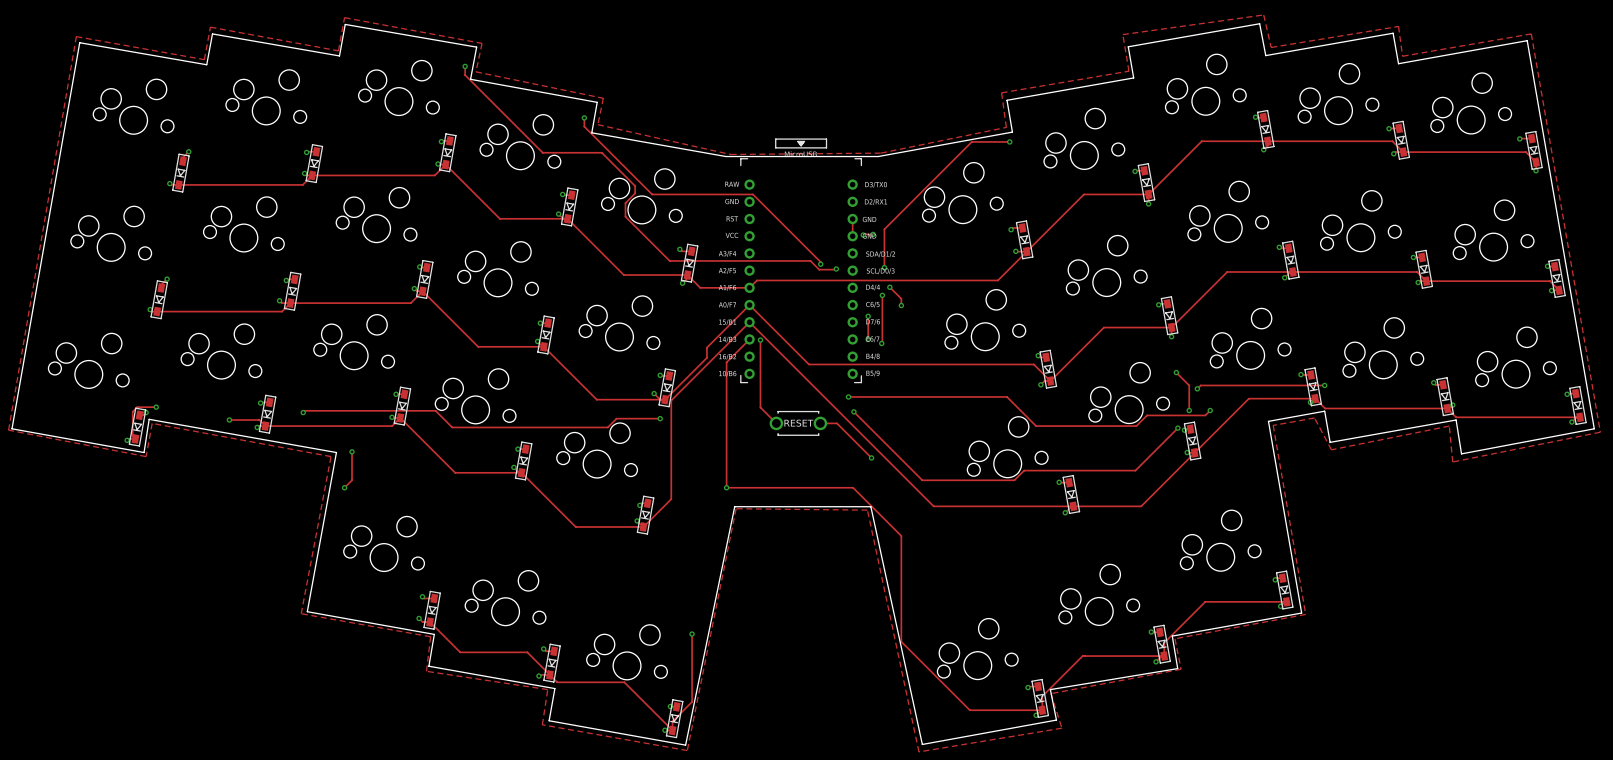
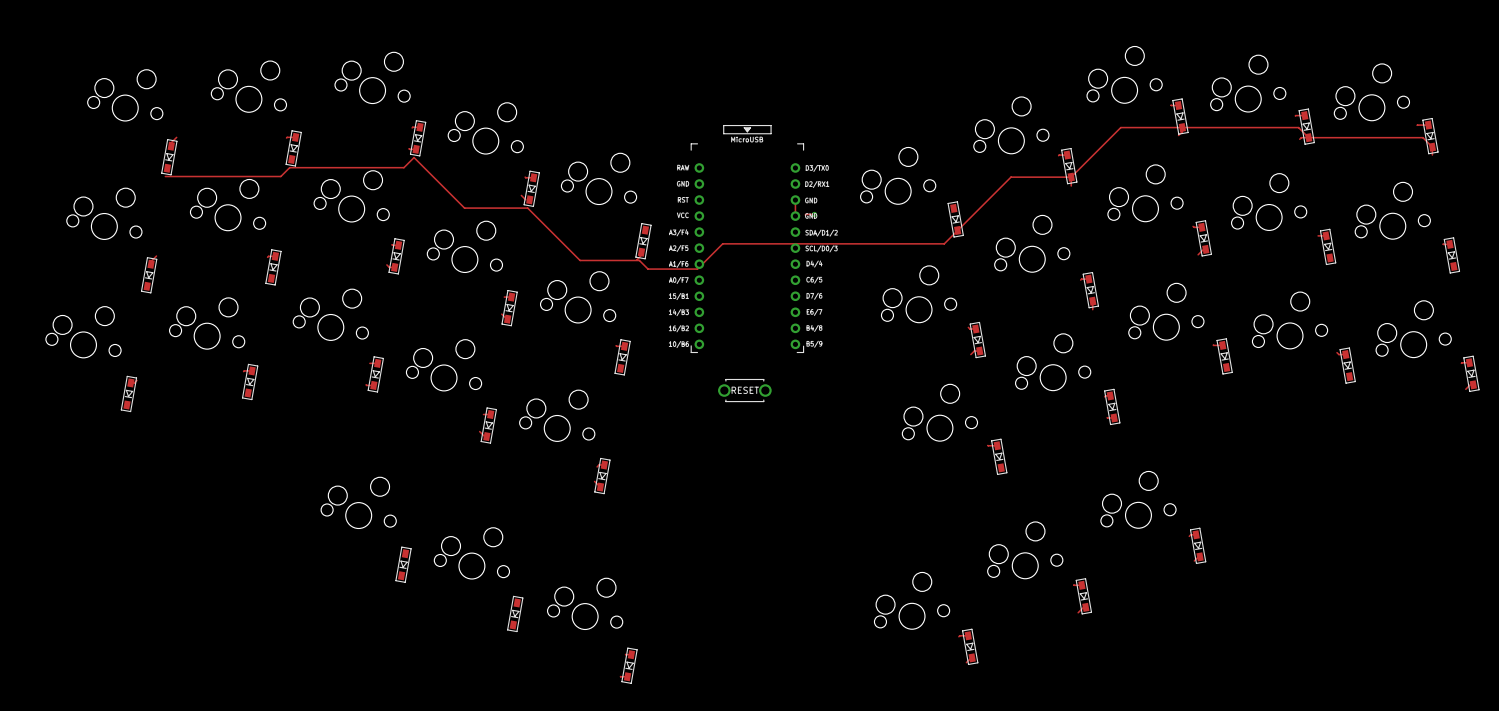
zone outline: (1263, 14) (1122, 34) (1128, 71) (1001, 92) (1006, 127) (881, 153) (730, 154) (597, 124) (603, 98) (475, 71) (482, 43) (344, 17) (338, 50) (210, 27) (204, 59) (76, 36) (8, 430) (146, 456) (152, 423) (331, 456) (301, 613) (430, 636) (426, 671) (547, 689) (542, 724) (687, 750) (736, 508) (867, 510) (918, 751) (1061, 728) (1051, 693) (1181, 669) (1175, 638) (1305, 614) (1273, 425) (1314, 417) (1331, 449) (1449, 426) (1452, 462) (1600, 432) (1531, 33) (1402, 56) (1398, 26) (1271, 47) (1263, 14) -> none
board edge: (1259, 23) (1128, 46) (1133, 77) (1007, 100) (1012, 132) (878, 156) (725, 156) (591, 132) (597, 102) (470, 79) (476, 47) (345, 24) (339, 55) (212, 33) (206, 64) (79, 42) (11, 428) (144, 452) (149, 419) (336, 452) (307, 611) (434, 634) (428, 666) (554, 688) (549, 720) (685, 745) (734, 506) (870, 506) (922, 744) (1056, 720) (1050, 689) (1177, 668) (1172, 636) (1301, 613) (1268, 421) (1324, 411) (1330, 442) (1456, 420) (1461, 453) (1594, 428) (1527, 40) (1398, 63) (1393, 33) (1265, 55) (1259, 23) -> none
track: (465, 66) (465, 75) (542, 152) (601, 152) (635, 186) (635, 193) (625, 203) (625, 216) (669, 260) (810, 260) (819, 269) (836, 268) -> none
via: (465, 66) -> none
track: (584, 117) (584, 126) (652, 194) (753, 194) (820, 264) -> none
via: (584, 117) -> none
via: (1255, 117) -> none
via: (1389, 128) -> none
via: (1519, 138) -> none
via: (441, 141) -> none
track: (1009, 141) (971, 141) (884, 229) (884, 267) -> none
via: (1009, 141) -> none
via: (1263, 149) -> none
via: (188, 151) -> none
via: (306, 152) -> none
via: (1393, 153) -> none
via: (438, 163) -> none
via: (1536, 170) -> none
via: (1135, 171) -> none
track: (304, 173) (306, 175) (434, 175) (445, 164) (499, 218) (567, 218) (623, 275) (687, 275) (700, 287) (749, 287) (756, 280) (997, 280) (1012, 266) -> (165, 176) (280, 176) (289, 167) (403, 167) (414, 157) (464, 208) (527, 208) (580, 260) (639, 260) (648, 269) (697, 269) (722, 243) (944, 243)
via: (304, 173) -> none
track: (312, 175) (302, 184) (169, 183) -> none
via: (169, 183) -> none
via: (562, 194) -> none
via: (1148, 203) -> none
via: (558, 214) -> none
track: (1022, 228) (1011, 229) -> none
via: (1011, 229) -> none
via: (863, 235) -> none
via: (1279, 247) -> none
track: (679, 249) (681, 251) (691, 251) -> none
via: (679, 249) -> none
track: (1015, 251) (1026, 251) -> none
via: (1015, 251) -> none
via: (1413, 257) -> none
via: (820, 264) -> none
via: (419, 266) -> none
via: (1547, 266) -> none
via: (884, 267) -> none
via: (836, 268) -> none
via: (1284, 277) -> none
via: (167, 279) -> none
via: (286, 280) -> none
track: (1426, 281) (1417, 272) (1227, 272) (1171, 327) (1103, 327) (1050, 381) (1033, 364) (808, 364) (749, 305) (706, 347) (706, 357) (665, 399) (596, 399) (543, 346) (478, 346) (422, 291) (410, 303) (281, 303) (279, 300) -> none
track: (1418, 282) (1549, 281) (1559, 290) (1551, 290) -> none
via: (1418, 282) -> none
via: (682, 283) -> none
track: (889, 287) (901, 298) (901, 305) -> none
via: (889, 287) -> none
via: (414, 288) -> none
via: (1551, 290) -> none
track: (882, 295) (881, 343) -> none
via: (882, 295) -> none
via: (279, 300) -> none
track: (290, 303) (282, 311) (152, 311) (150, 309) -> none
via: (1158, 304) -> none
via: (901, 305) -> none
via: (150, 309) -> none
track: (868, 316) (868, 339) -> none
via: (868, 316) -> none
via: (540, 323) -> none
via: (1171, 336) -> none
track: (749, 339) (726, 362) (726, 487) (853, 487) (901, 536) (901, 641) (969, 710) (1042, 710) (1042, 696) (1082, 655) (1164, 656) (1164, 642) (1205, 601) (1286, 601) -> none
via: (868, 339) -> none
track: (760, 340) (760, 407) (776, 423) -> none
via: (760, 340) -> none
via: (537, 341) -> none
via: (881, 343) -> none
via: (1038, 355) -> none
track: (1176, 372) (1189, 385) (1189, 410) -> none
via: (1176, 372) -> none
via: (1300, 374) -> none
via: (660, 375) -> none
via: (1433, 382) -> none
via: (1040, 384) -> none
track: (1324, 385) (1200, 385) (1197, 388) -> none
via: (1324, 385) -> none
via: (1197, 388) -> none
track: (654, 393) (660, 399) -> none
via: (654, 393) -> none
via: (396, 394) -> none
via: (1567, 394) -> none
track: (848, 396) (1007, 396) (1036, 426) (1136, 426) (1147, 415) (1205, 415) (1210, 410) -> none
via: (848, 396) -> none
via: (1310, 402) -> none
via: (260, 403) -> none
track: (1452, 405) (1449, 408) (1325, 408) (1315, 398) (1248, 398) (1141, 506) (933, 506) (749, 322) (671, 400) (671, 499) (643, 526) (575, 526) (521, 472) (455, 472) (400, 417) (392, 426) (257, 427) -> none
via: (1452, 405) -> none
track: (156, 407) (137, 407) (132, 411) (132, 436) (135, 438) (127, 440) -> none
via: (156, 407) -> none
track: (1447, 408) (1456, 417) (1580, 417) -> none
via: (1189, 410) -> none
via: (1210, 410) -> none
track: (853, 411) (922, 480) (1014, 480) (1024, 470) (1135, 470) (1177, 428) -> none
via: (853, 411) -> none
via: (146, 412) -> none
track: (303, 412) (304, 410) (435, 410) (452, 427) (607, 427) (616, 418) (660, 418) -> none
via: (303, 412) -> none
via: (391, 417) -> none
via: (660, 418) -> none
track: (229, 420) (259, 420) (265, 426) -> none
via: (229, 420) -> none
via: (1571, 422) -> none
track: (820, 423) (837, 423) (871, 457) -> none
via: (257, 427) -> none
via: (1177, 428) -> none
via: (1184, 430) -> none
via: (127, 440) -> none
via: (517, 449) -> none
track: (352, 451) (352, 480) (344, 487) -> none
via: (352, 451) -> none
via: (1187, 452) -> none
via: (871, 457) -> none
via: (513, 467) -> none
via: (1059, 482) -> none
via: (344, 487) -> none
via: (726, 487) -> none
via: (639, 505) -> none
track: (1071, 506) (1065, 512) -> none
via: (1065, 512) -> none
via: (637, 520) -> none
via: (1275, 579) -> none
track: (422, 596) (434, 598) -> none
via: (422, 596) -> none
via: (1280, 606) -> none
track: (419, 618) (422, 622) (430, 622) (460, 652) (527, 652) (557, 682) (624, 682) (672, 730) (672, 721) (692, 701) (692, 634) -> none
via: (419, 618) -> none
via: (1151, 632) -> none
via: (692, 634) -> none
track: (543, 648) (546, 651) (554, 651) -> none
via: (543, 648) -> none
via: (1156, 661) -> none
track: (549, 674) (538, 676) -> none
via: (538, 676) -> none
via: (1028, 687) -> none
via: (670, 706) -> none
via: (1036, 715) -> none
via: (664, 730) -> none

